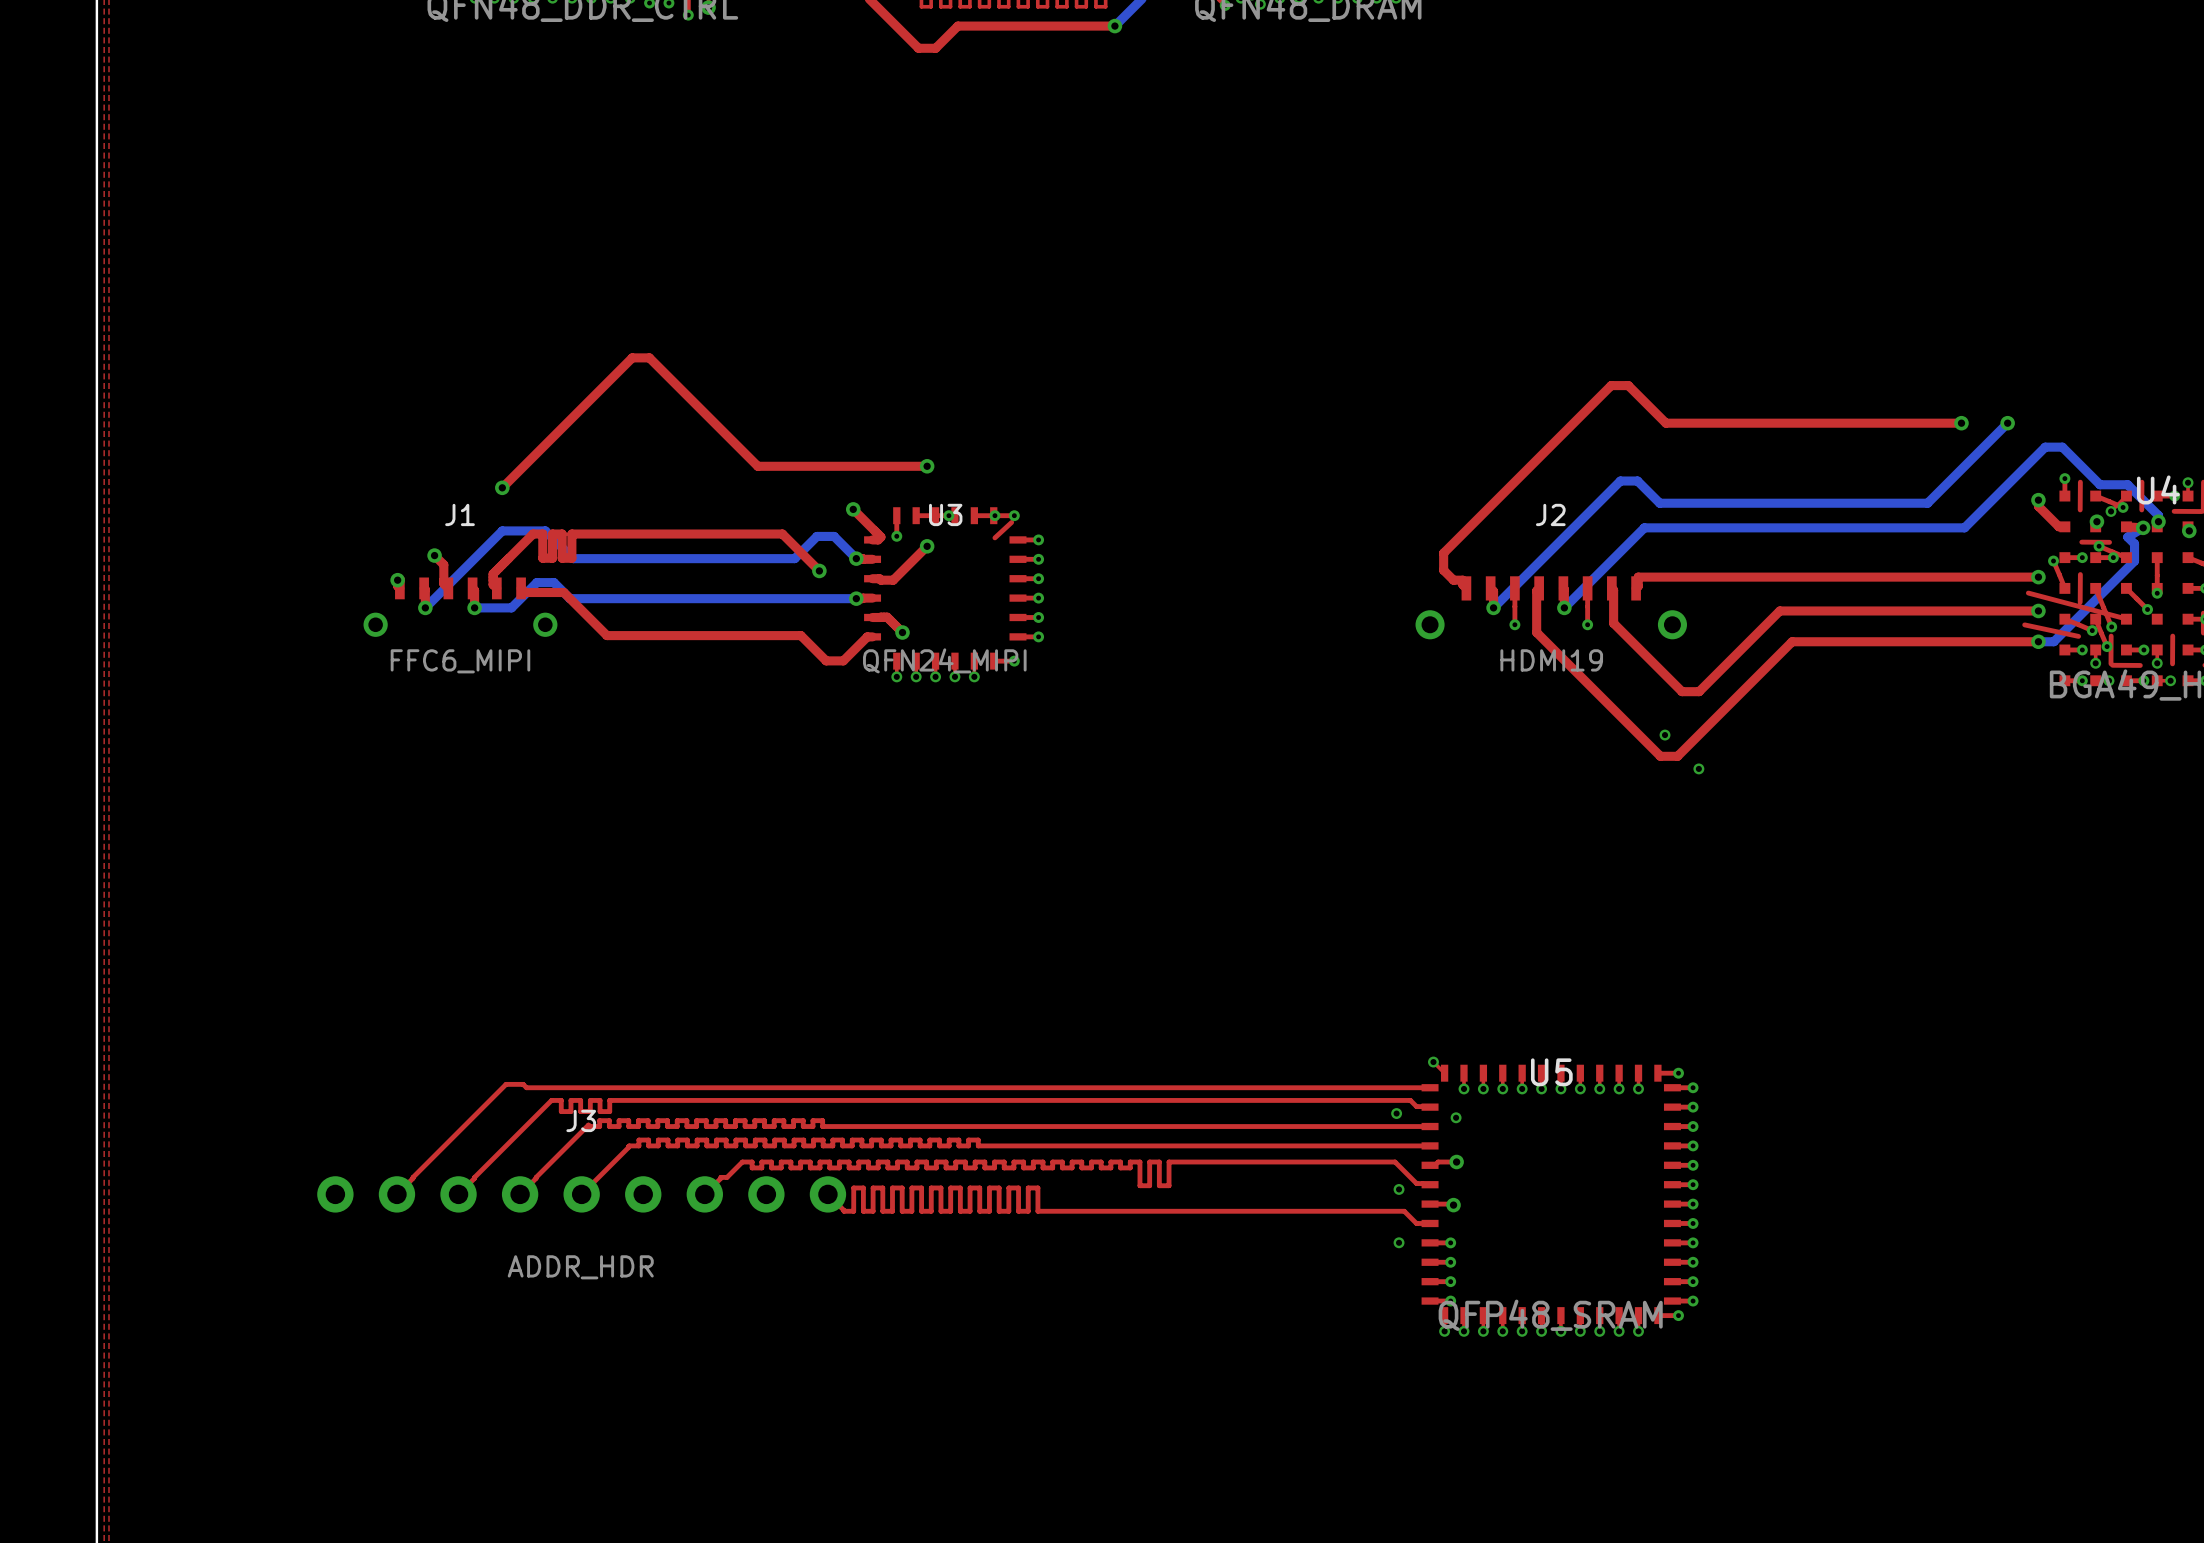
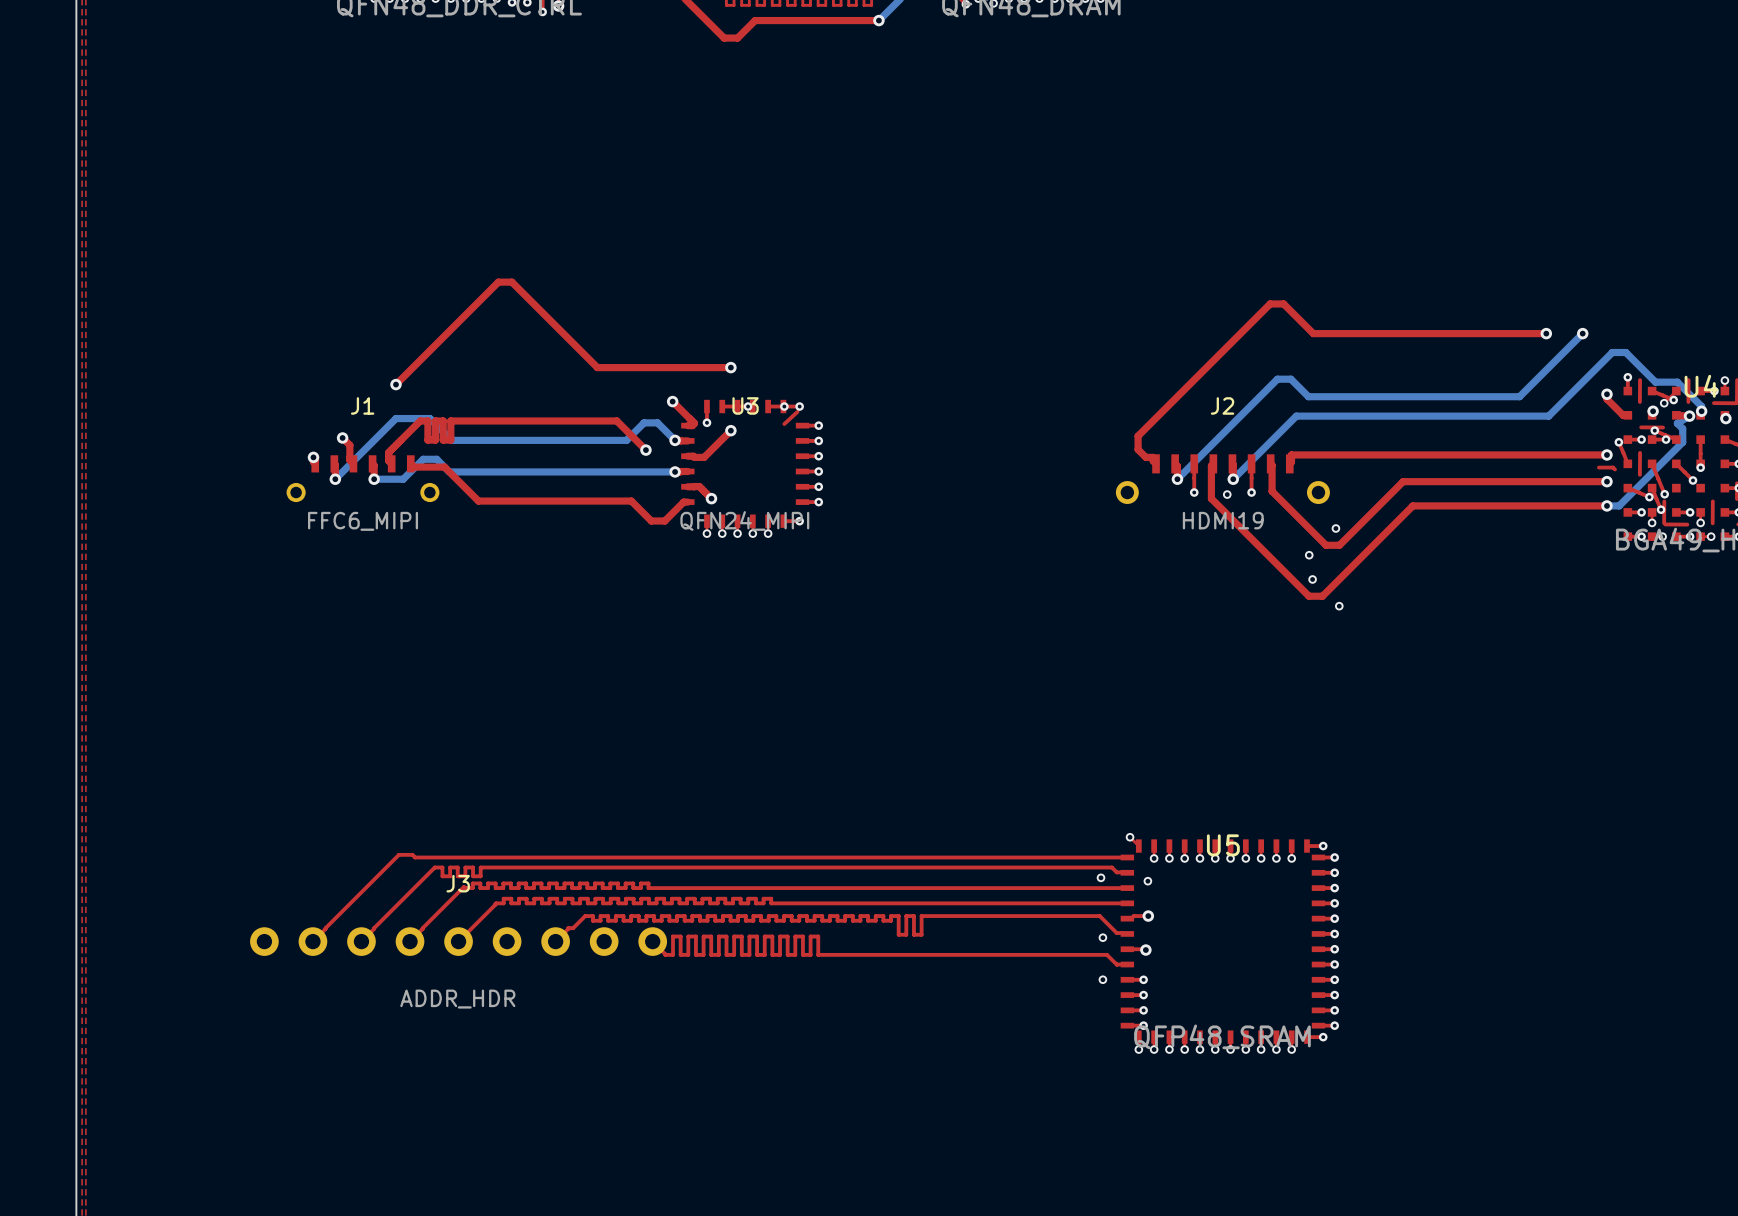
top track: (2028, 593) (2129, 619) -> (1598, 467) (1613, 467) (1614, 469)
top track: (2024, 624) (2078, 636) -> none
via: none -> (1227, 494)
via: none -> (1335, 528)
via: none -> (1309, 555)

